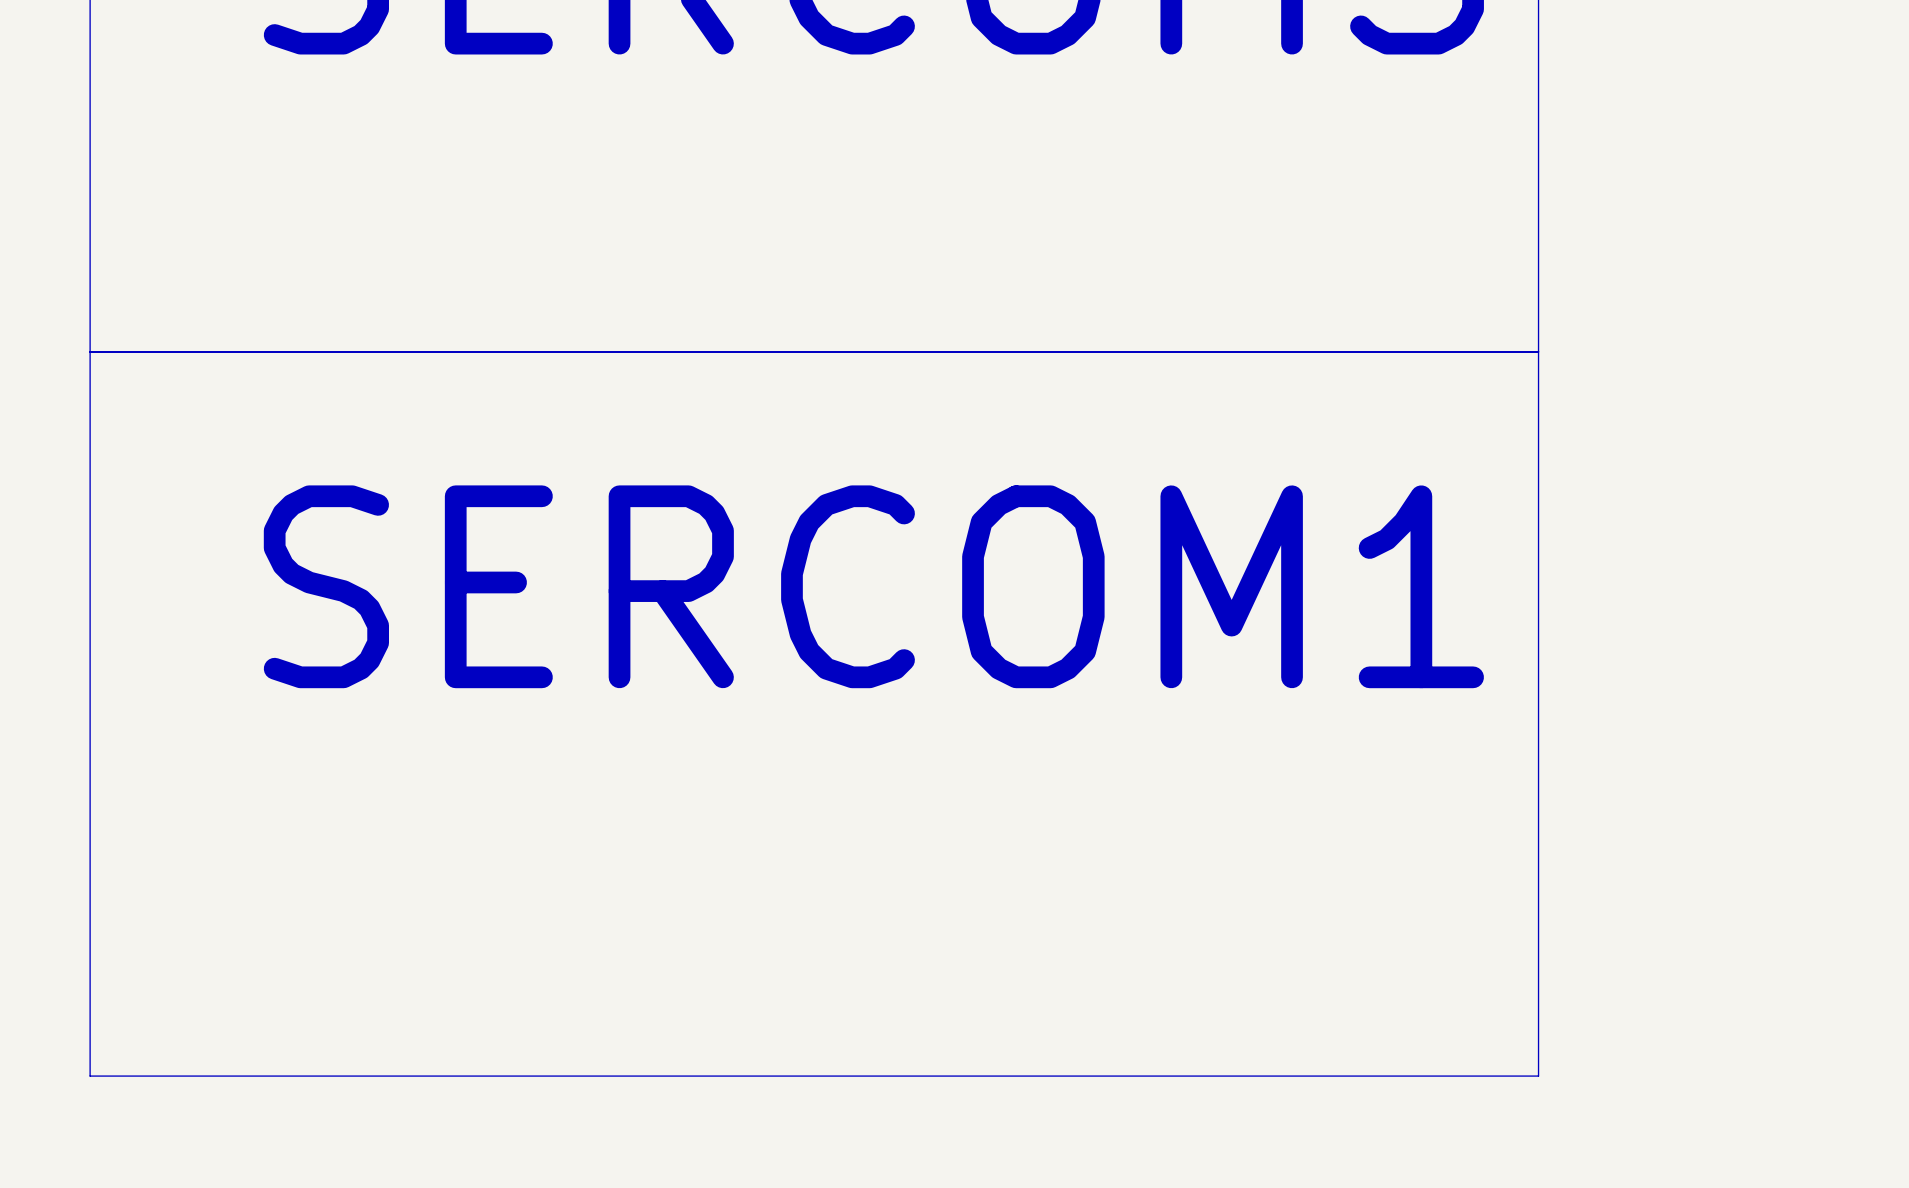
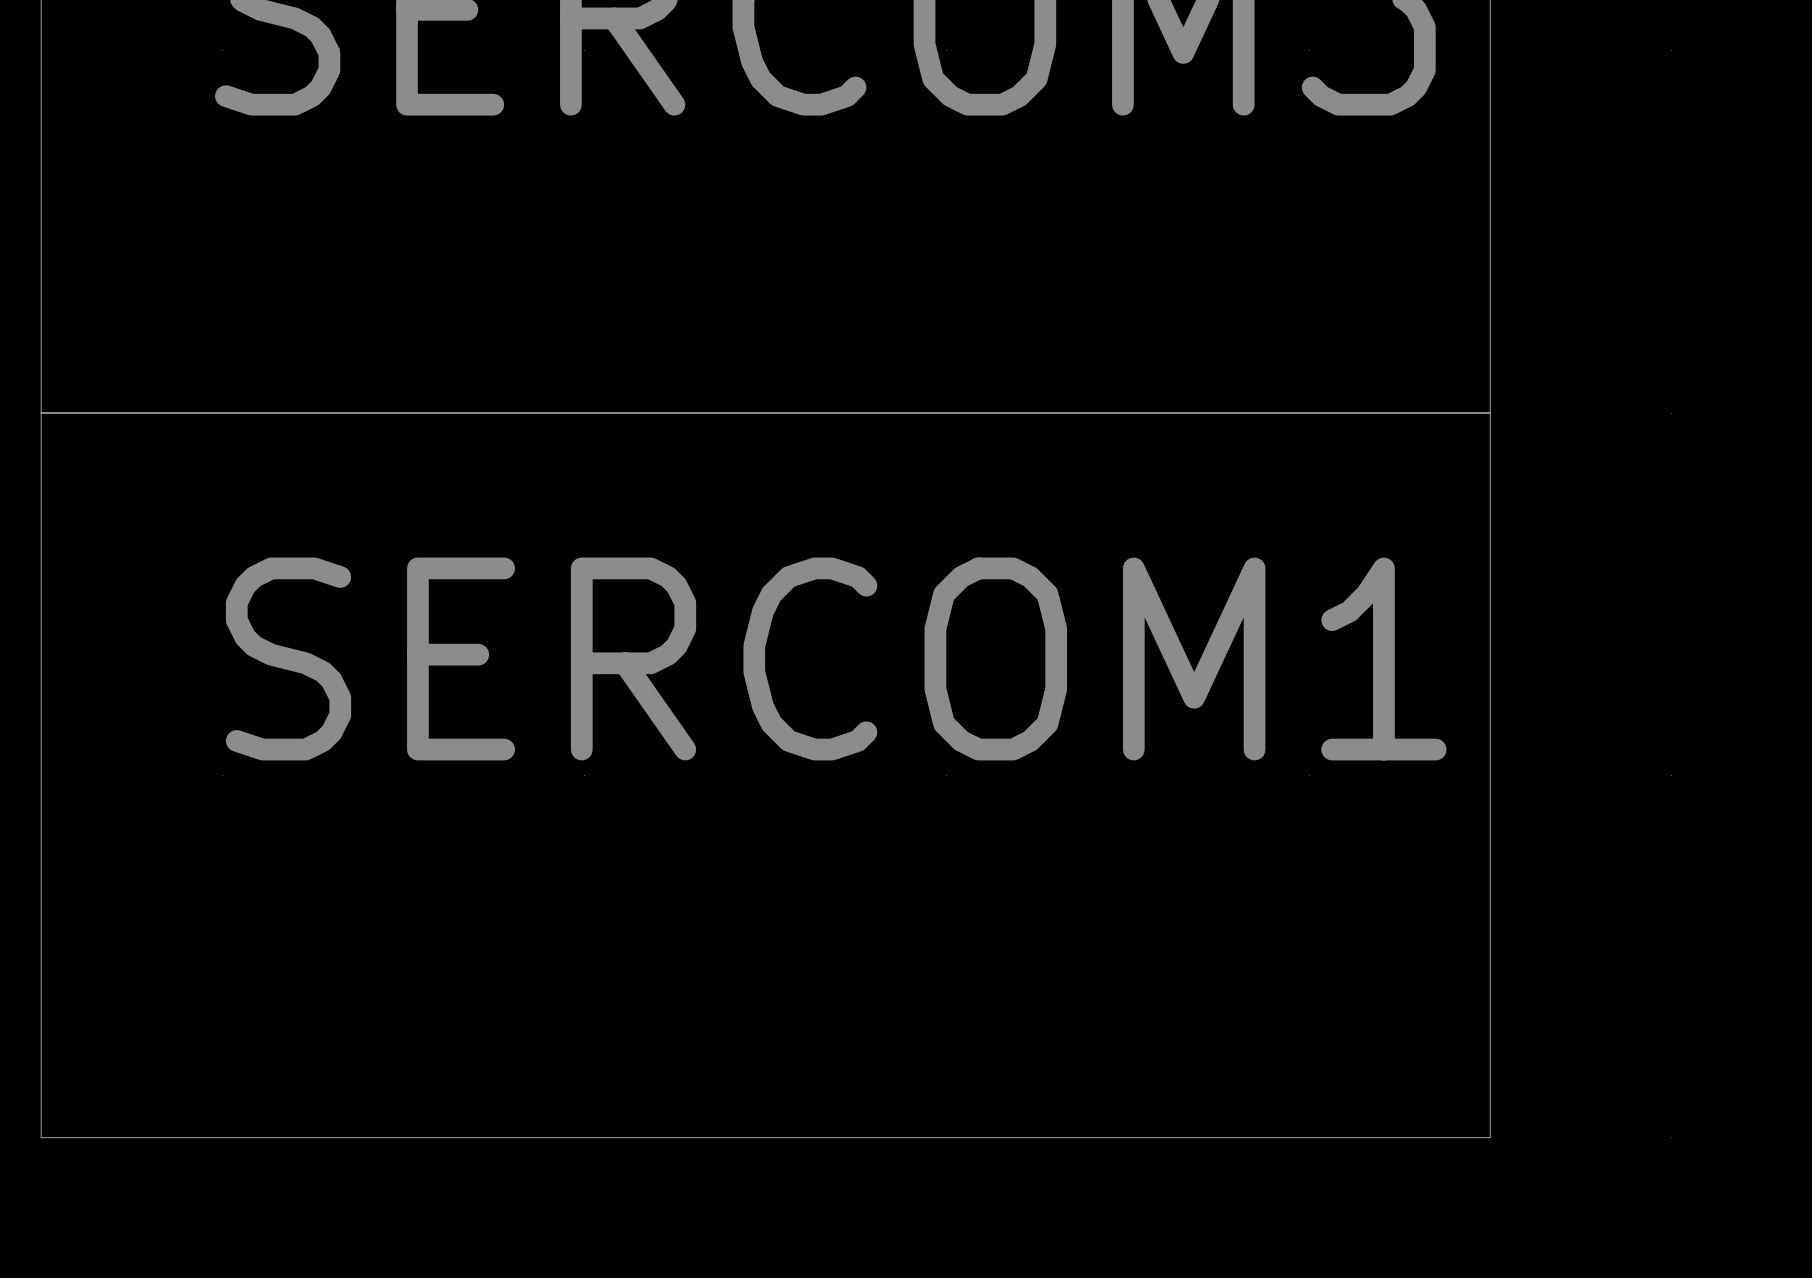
text position: SERCOM1 (873, 586) -> SERCOM1 (836, 658)

